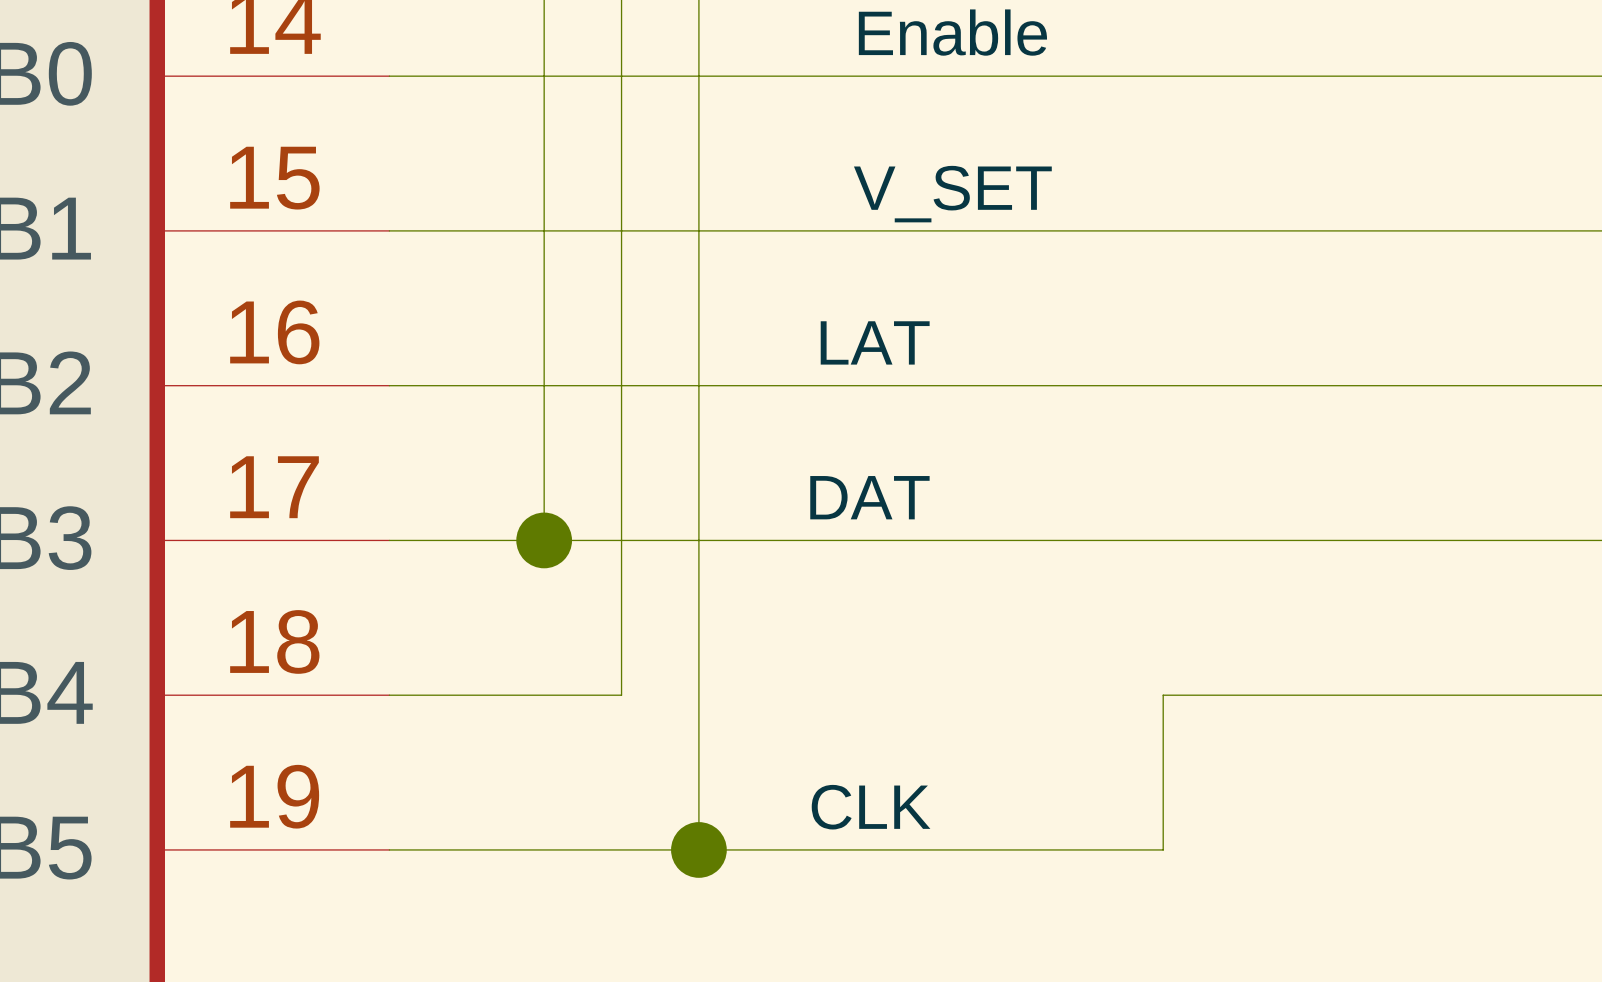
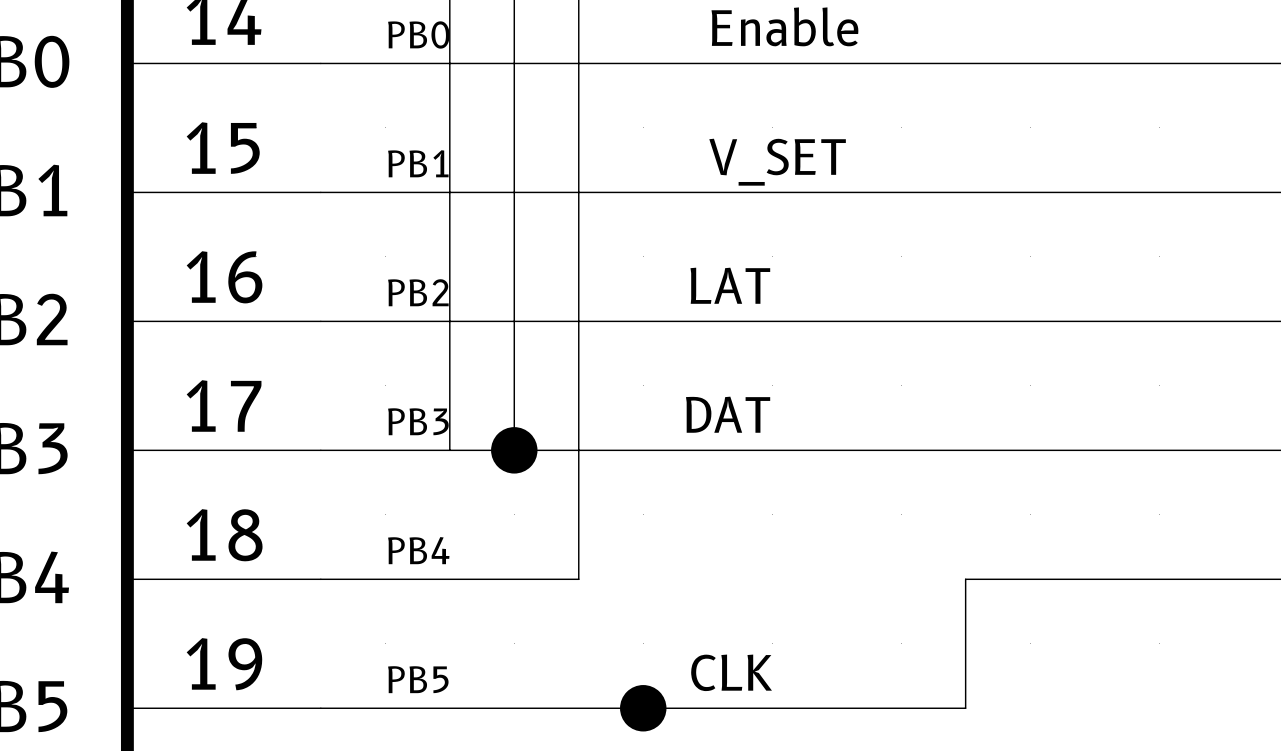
label: none -> PB0 (418, 34)
label: none -> PB1 (418, 163)
label: none -> PB2 (418, 292)
label: none -> PB3 (418, 421)
junction position: (544, 540) -> (514, 450)
wire: (621, 540) (621, 695) -> none
label: none -> PB4 (418, 550)
wire: (698, 695) (698, 849) -> (578, 579) (514, 579)
label: none -> PB5 (418, 679)
junction position: (698, 849) -> (643, 708)

